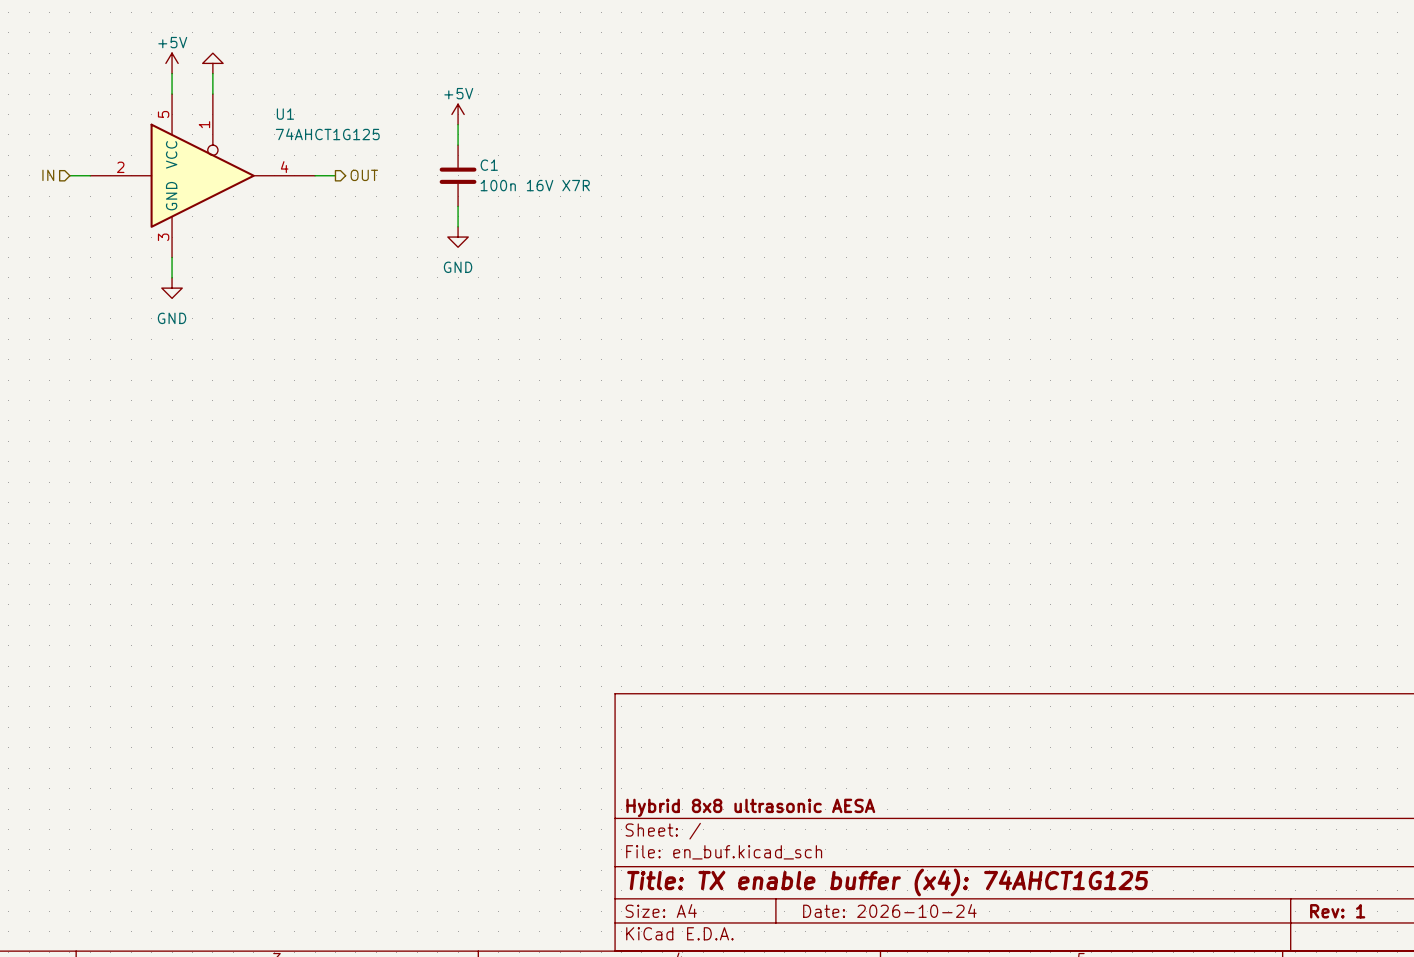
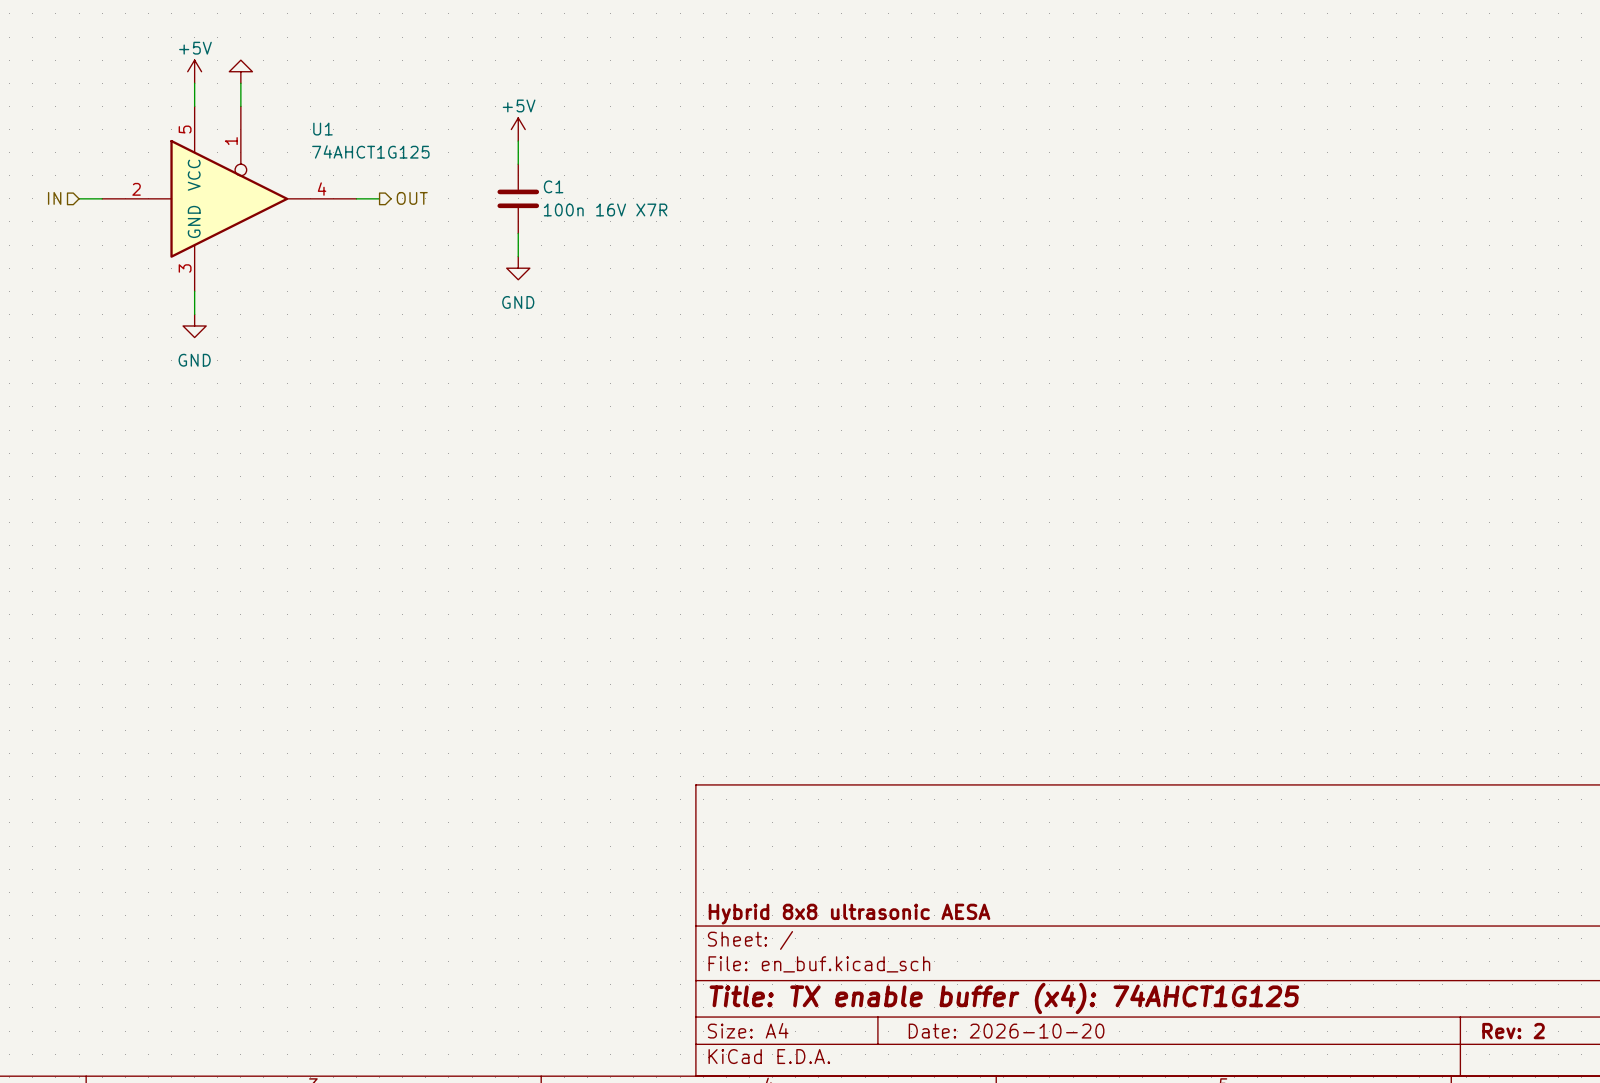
title block: Date: 2026-10-24 (889, 910) -> Date: 2026-10-20 (1006, 1031)
title block: Rev: 1 (1337, 911) -> Rev: 2 (1513, 1031)

